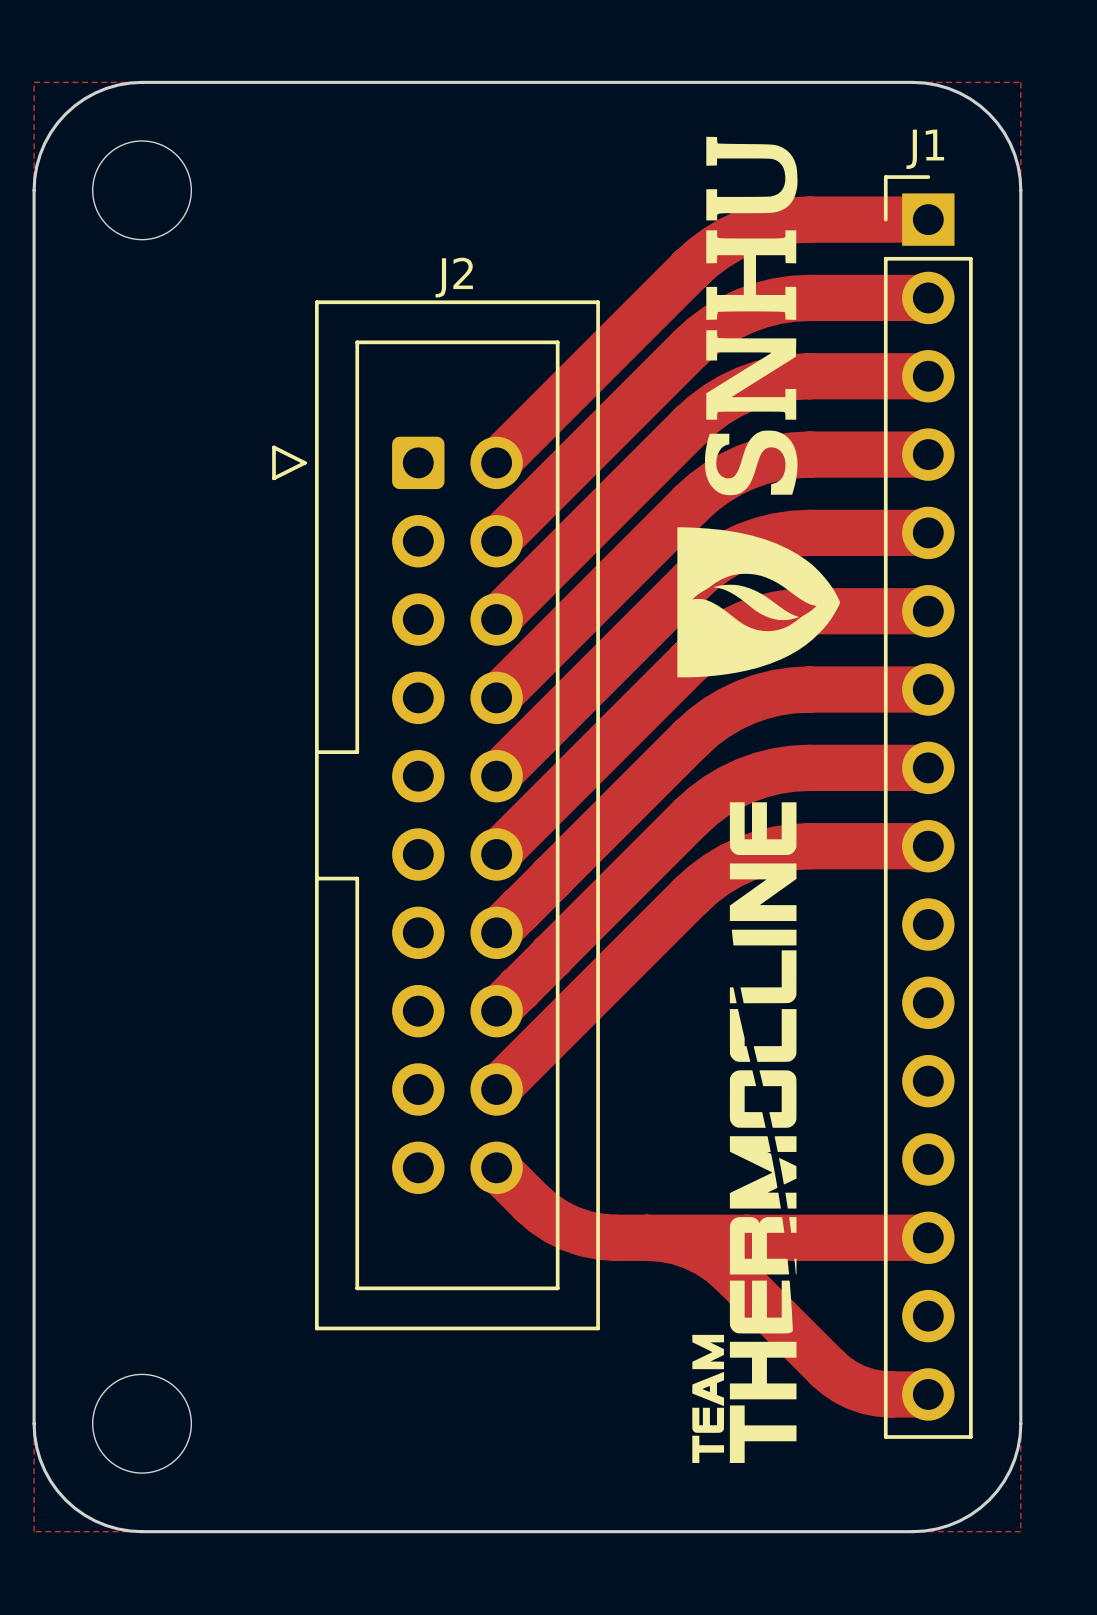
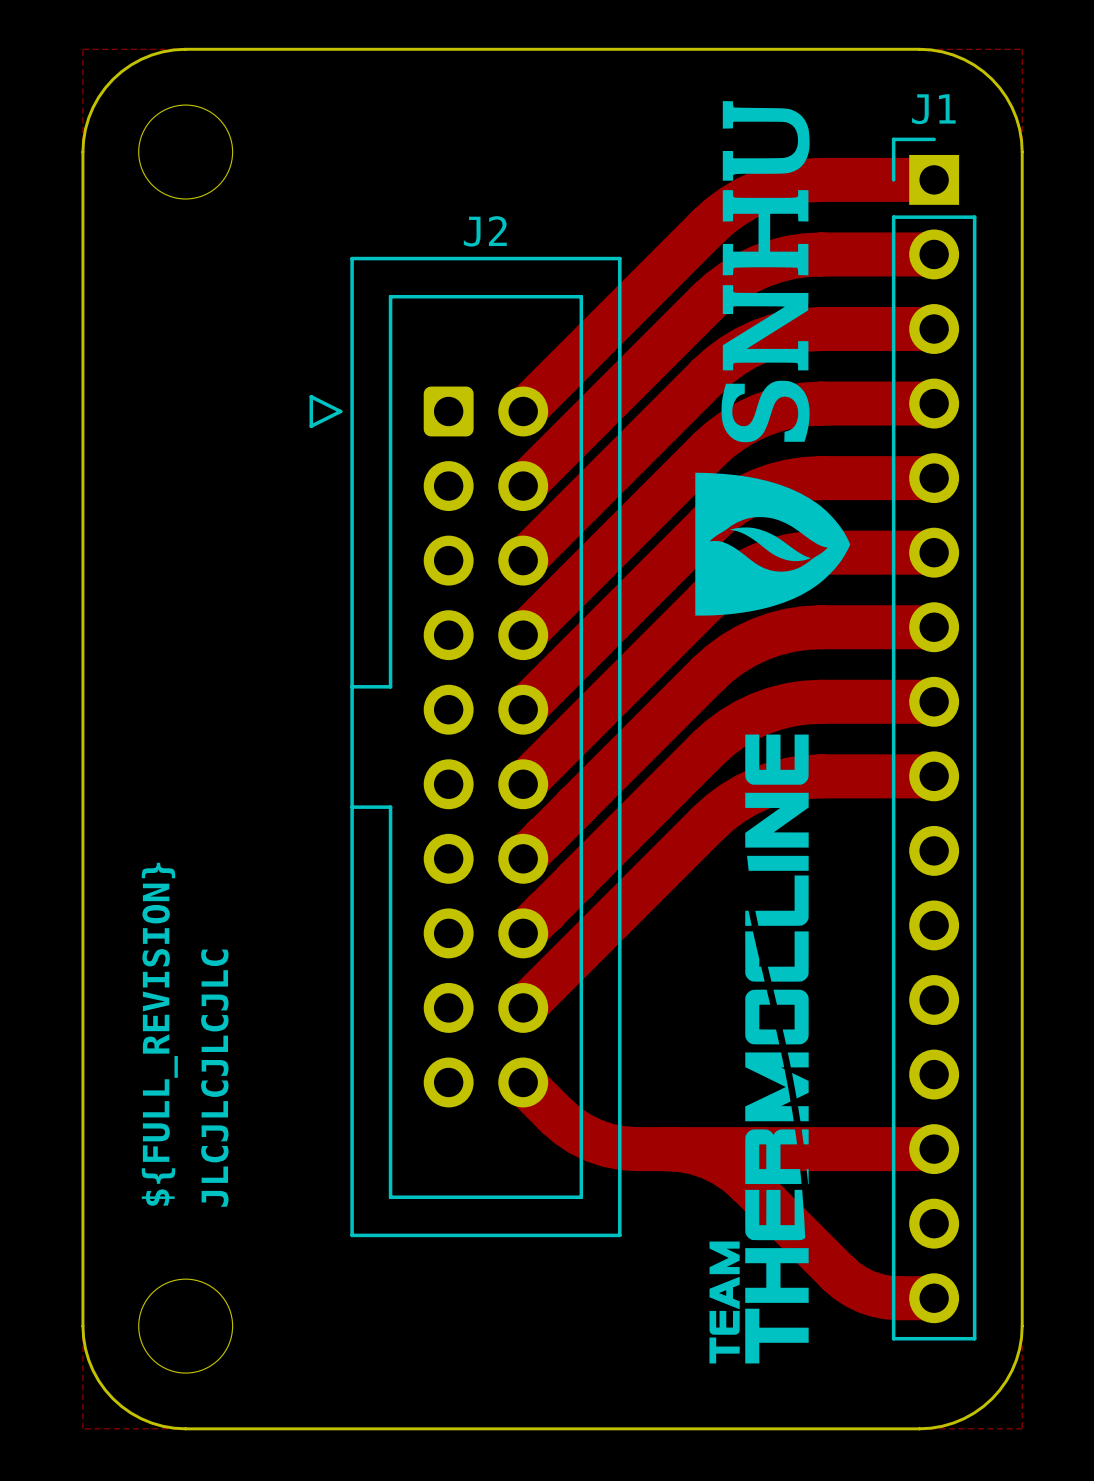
text: none -> ${FULL_REVISION} (159, 1034)
text: none -> JLCJLCJLCJLC (214, 1078)

